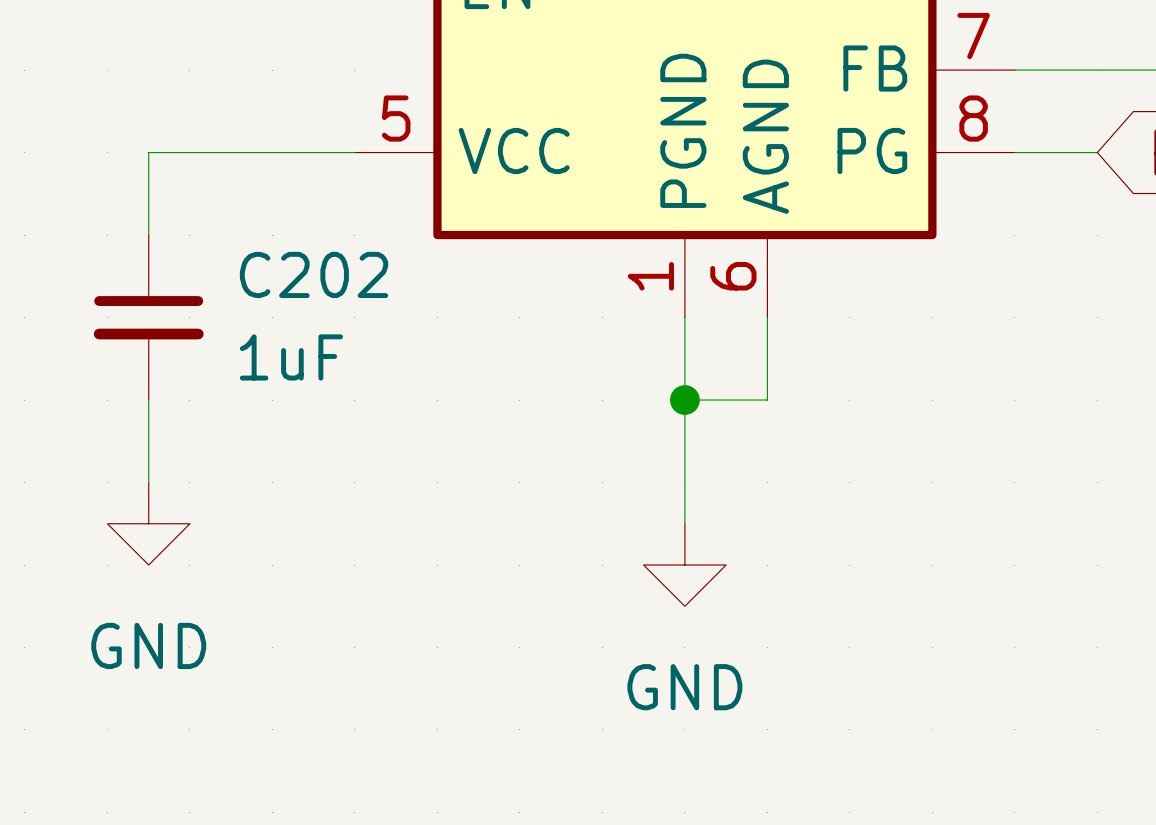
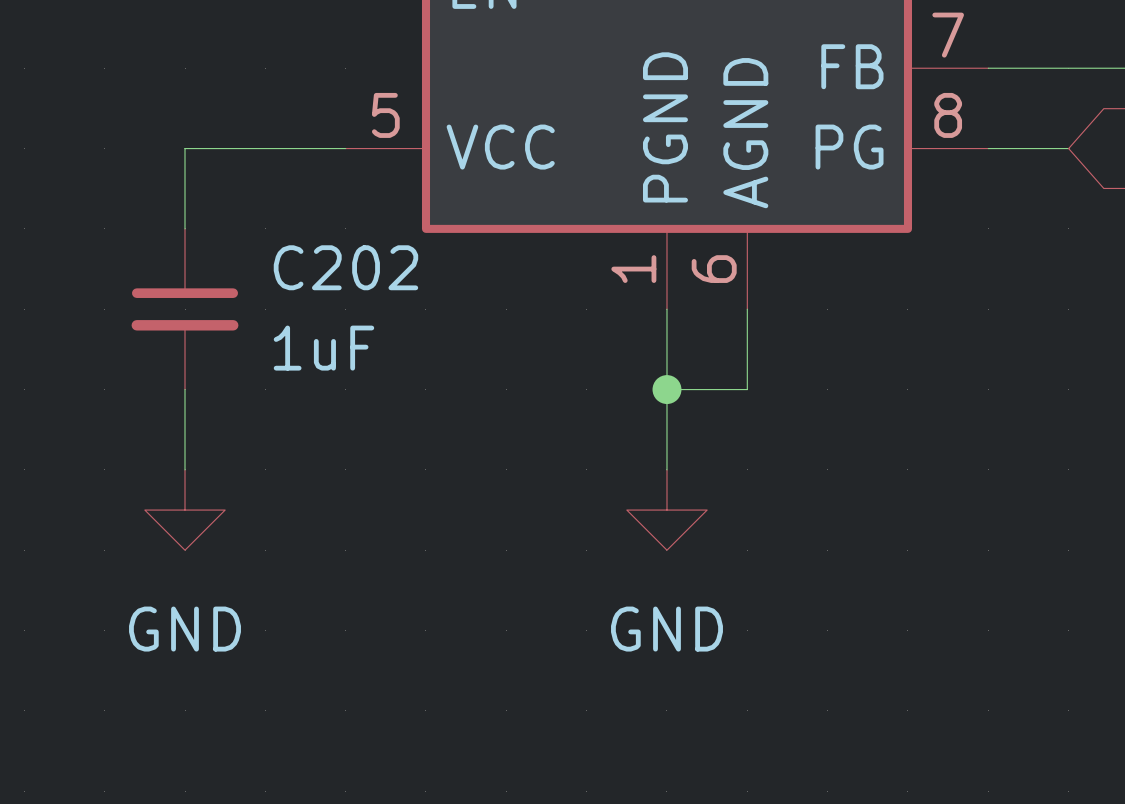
wire: (189, 152) (148, 152) (148, 235) -> (185, 148) (185, 228)
C202 position: (148, 317) -> (185, 309)
wire: (148, 400) (148, 482) -> (185, 389) (185, 469)
power symbol position: GND (148, 523) -> GND (185, 510)
power symbol position: GND (684, 565) -> GND (666, 510)

